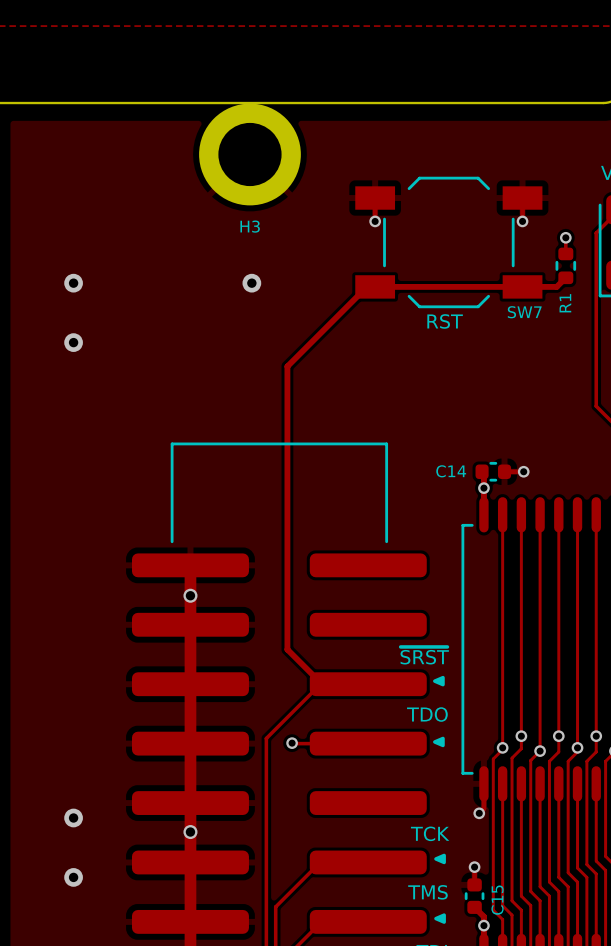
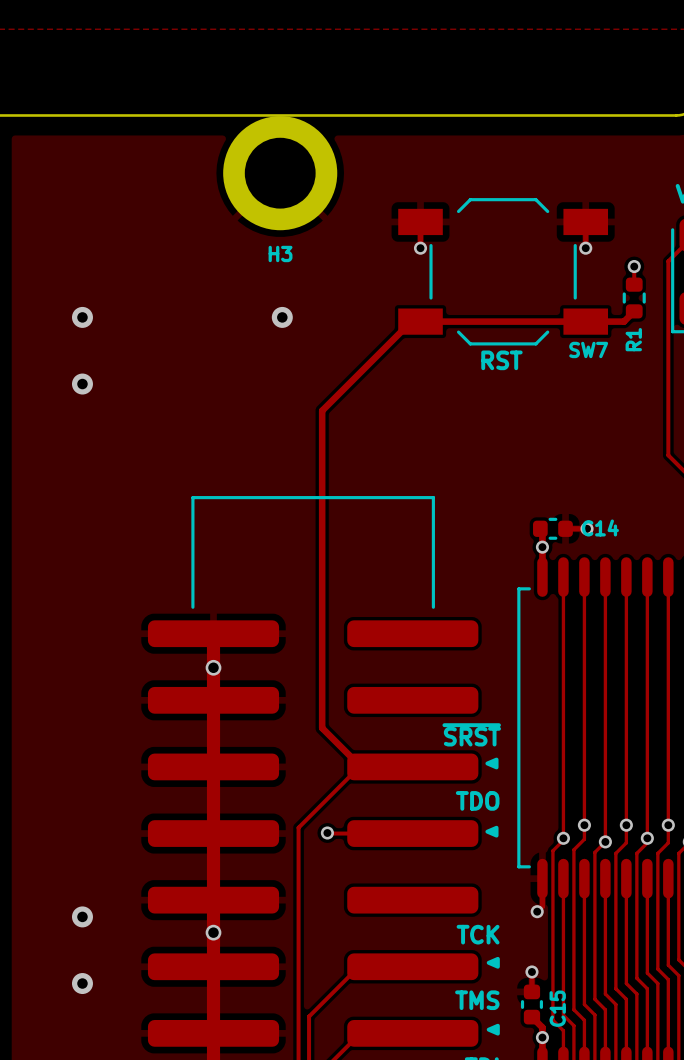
C14 name position: C14 (451, 471) -> C14 (600, 527)

